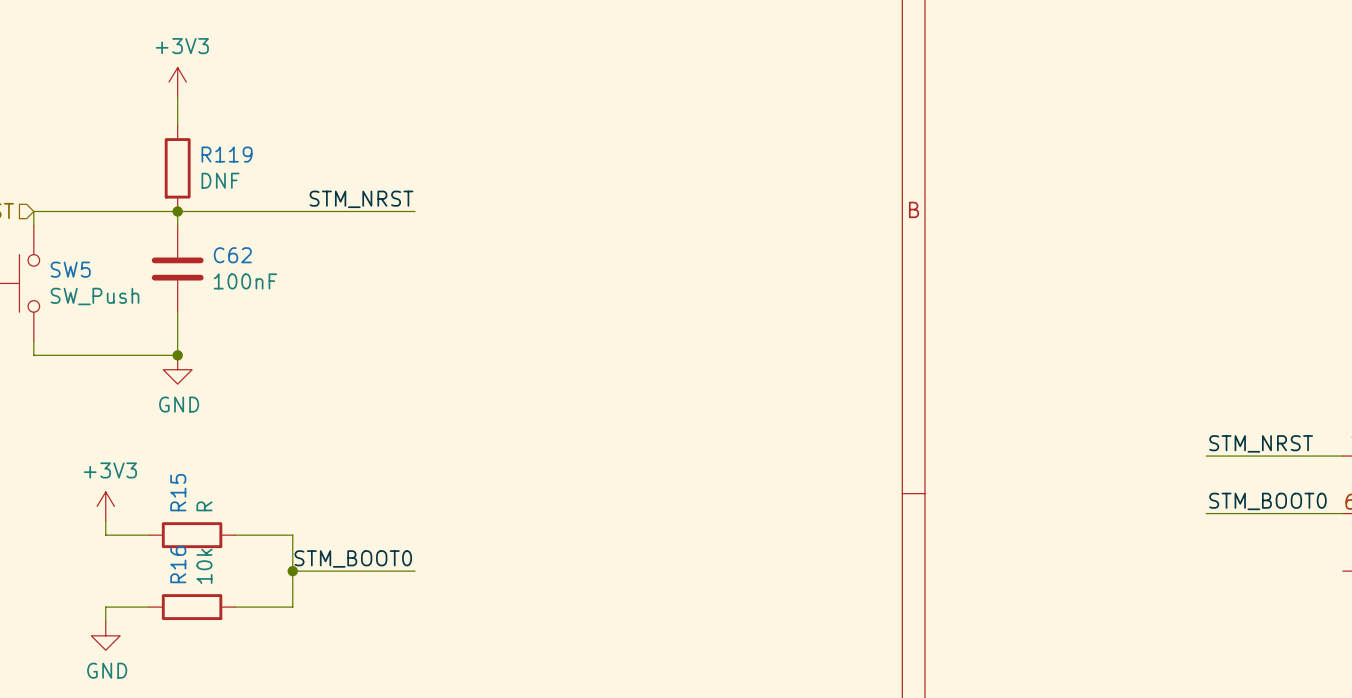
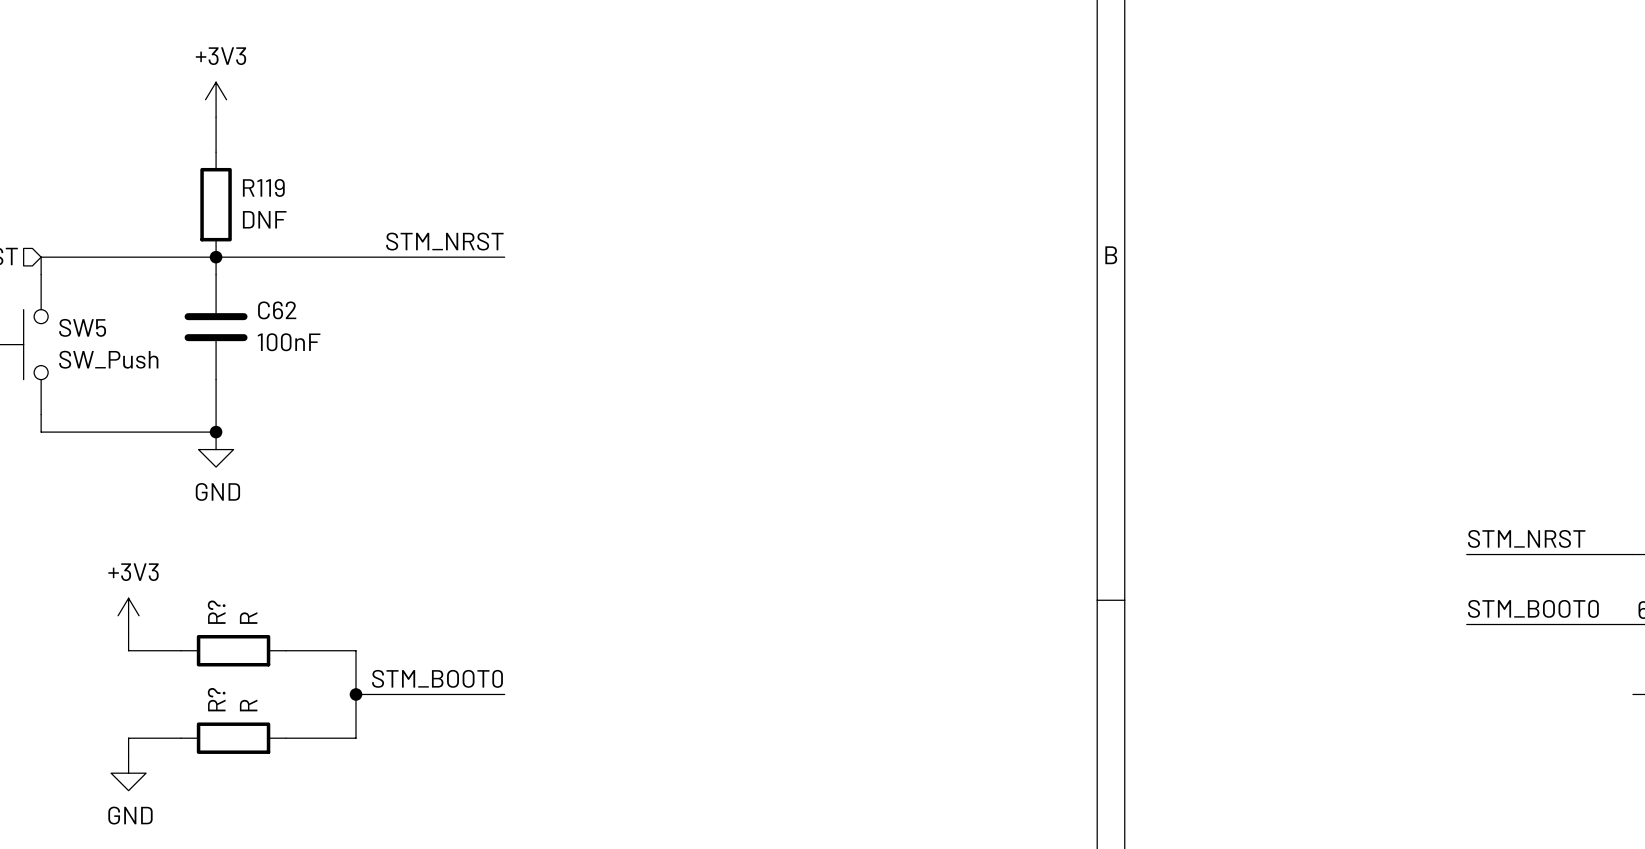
R15 name: R15 (178, 492) -> R? (216, 612)
R16 name: R16 (178, 564) -> R? (216, 699)
R16 value: 10k (204, 566) -> R (248, 705)

